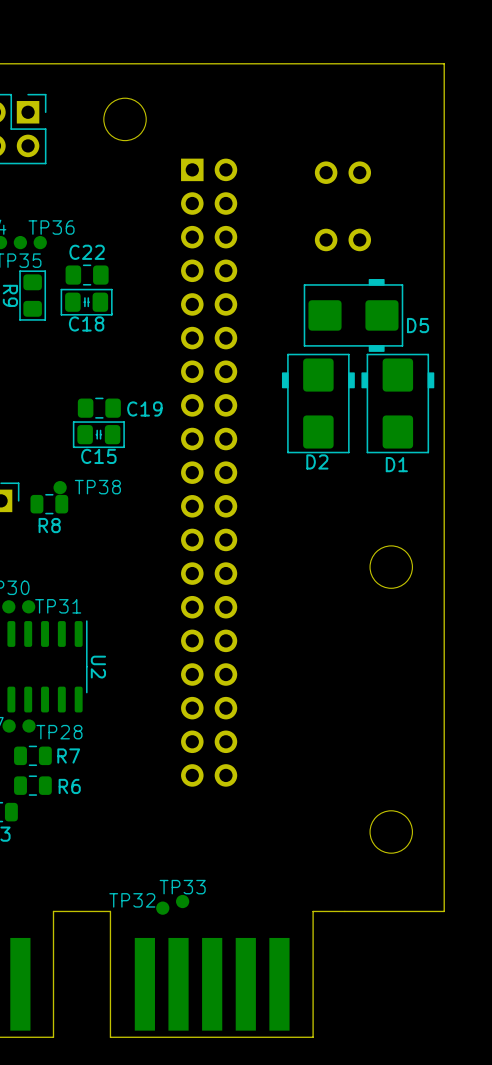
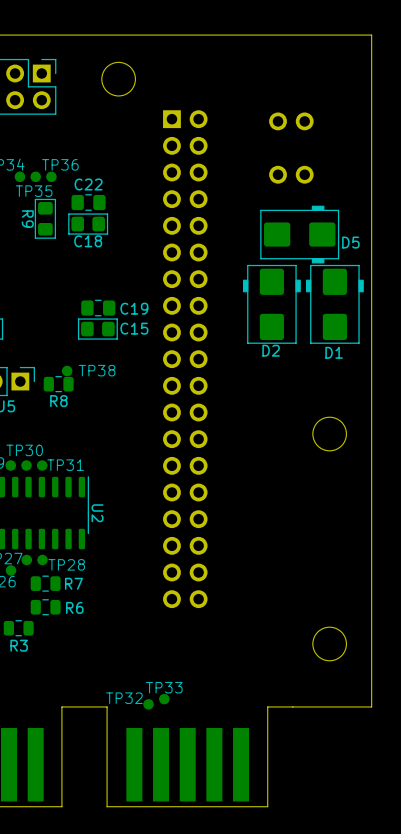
C18 footprint: [60, 288, 113, 316] -> [68, 213, 109, 235]
C15 footprint: [72, 421, 125, 449] -> [77, 318, 118, 340]
C15 name position: C15 (98, 456) -> C15 (134, 328)

